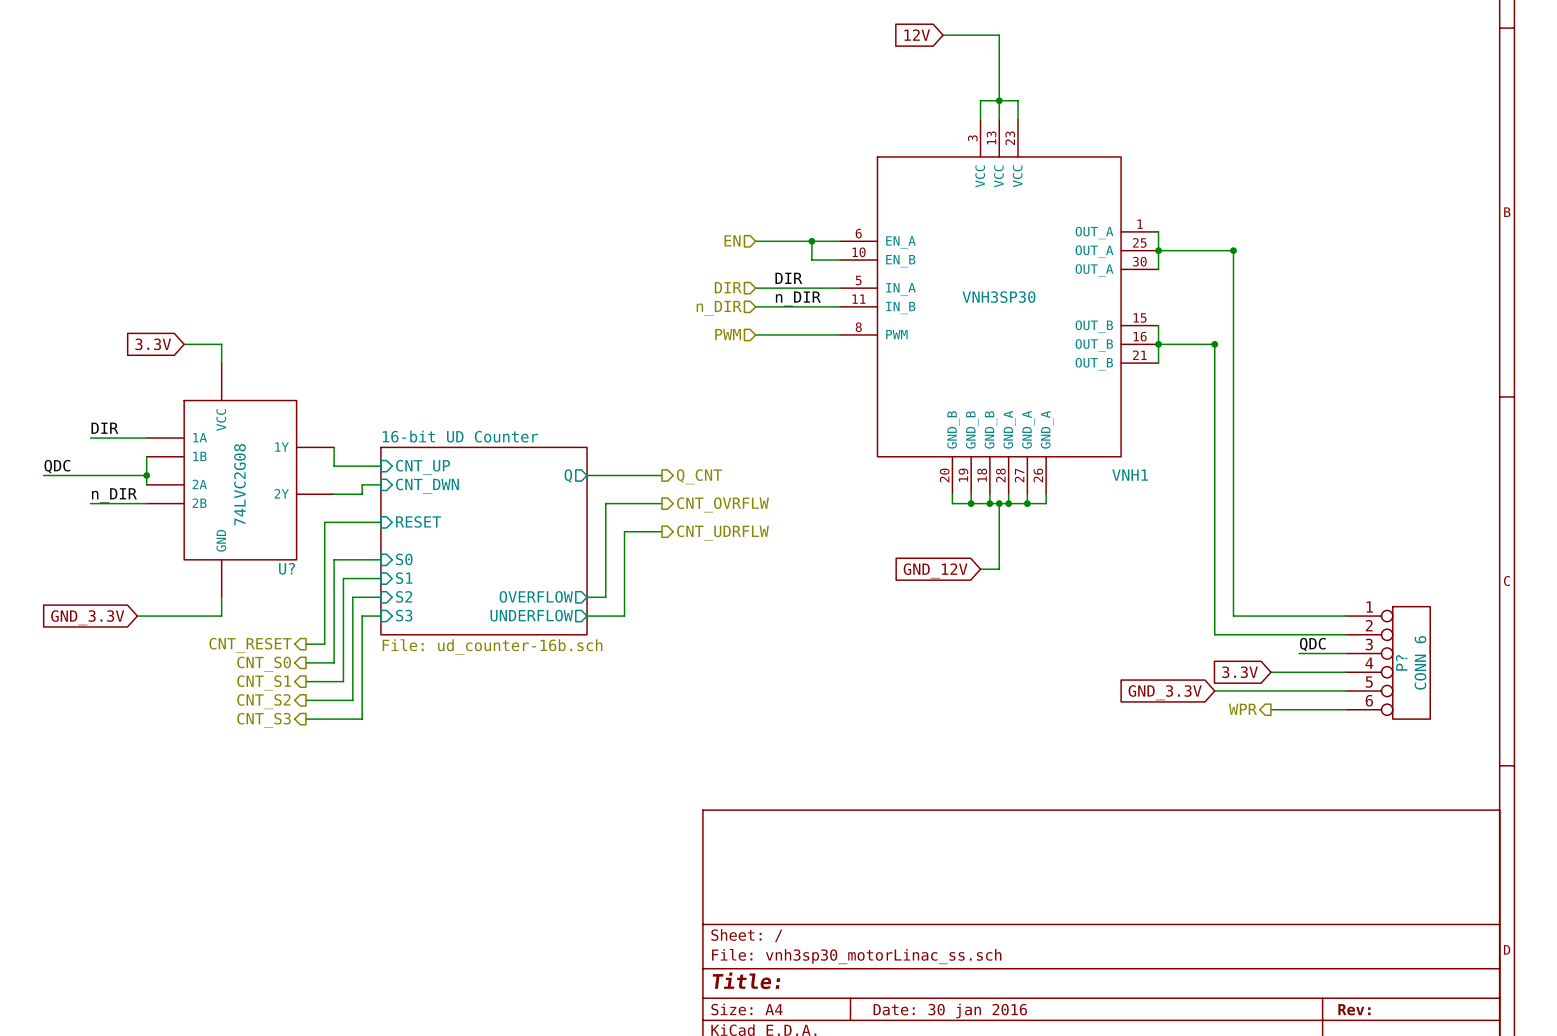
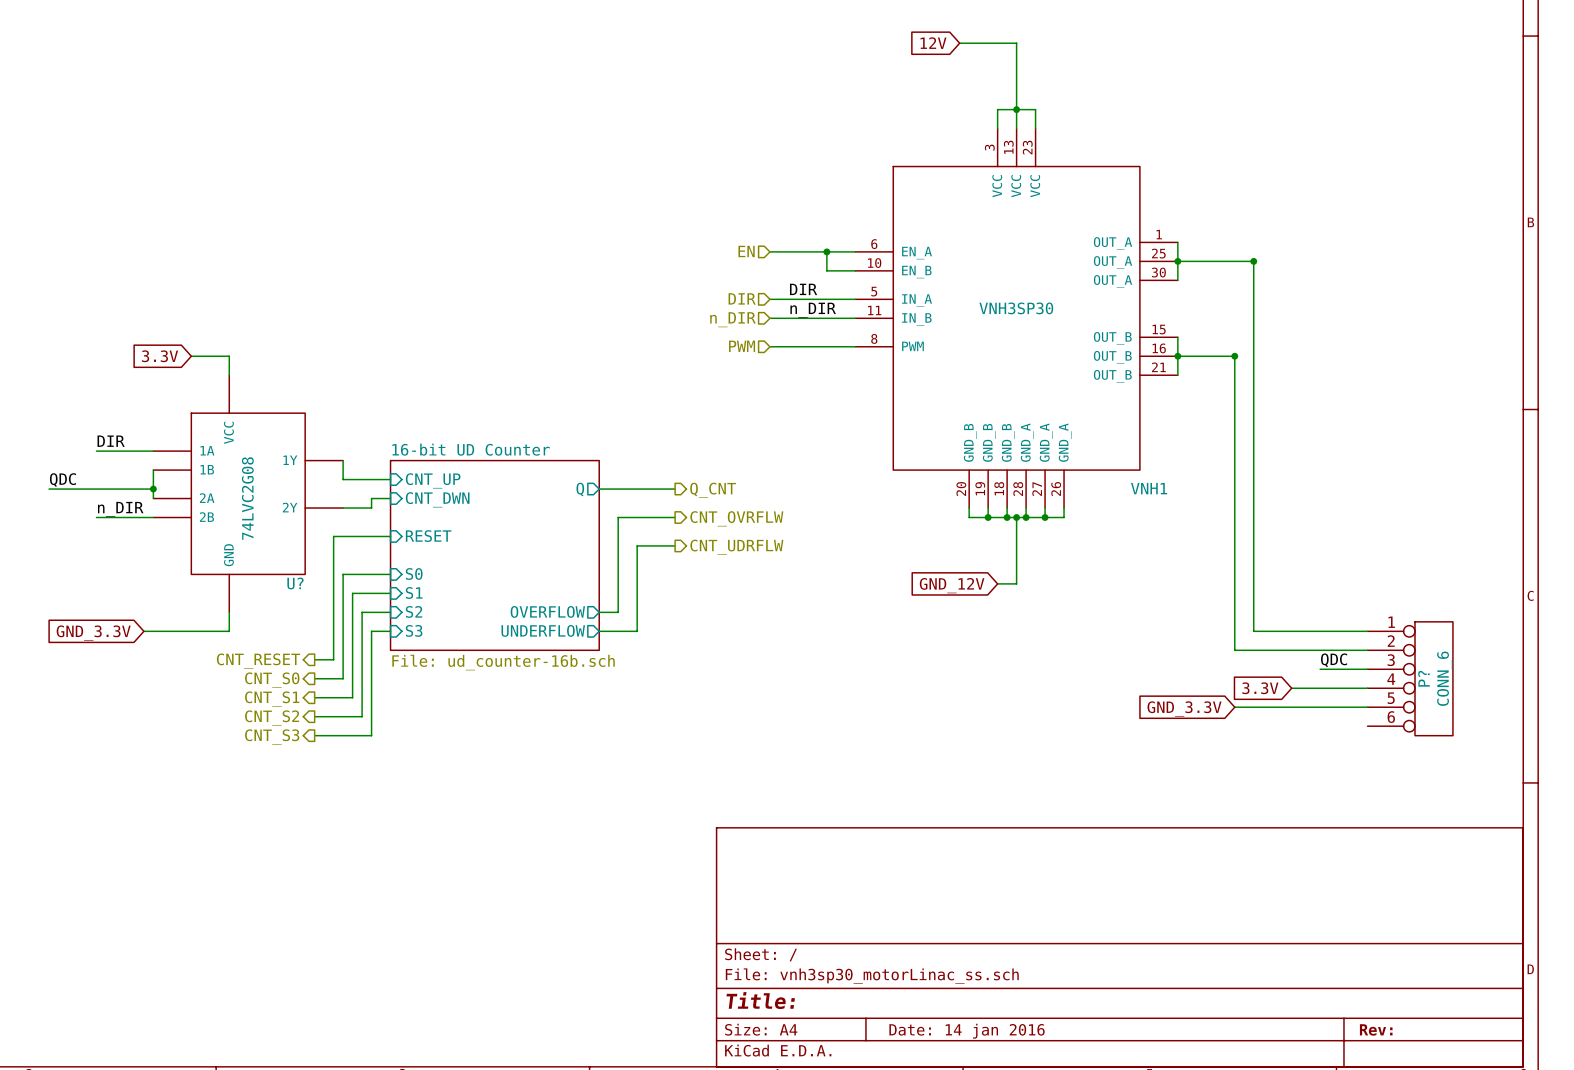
hierarchical label: WPR (1242, 709) -> none
wire: (1270, 709) (1345, 709) -> none
title block: Date: 30 jan 2016 (950, 1010) -> Date: 14 jan 2016 (967, 1031)

